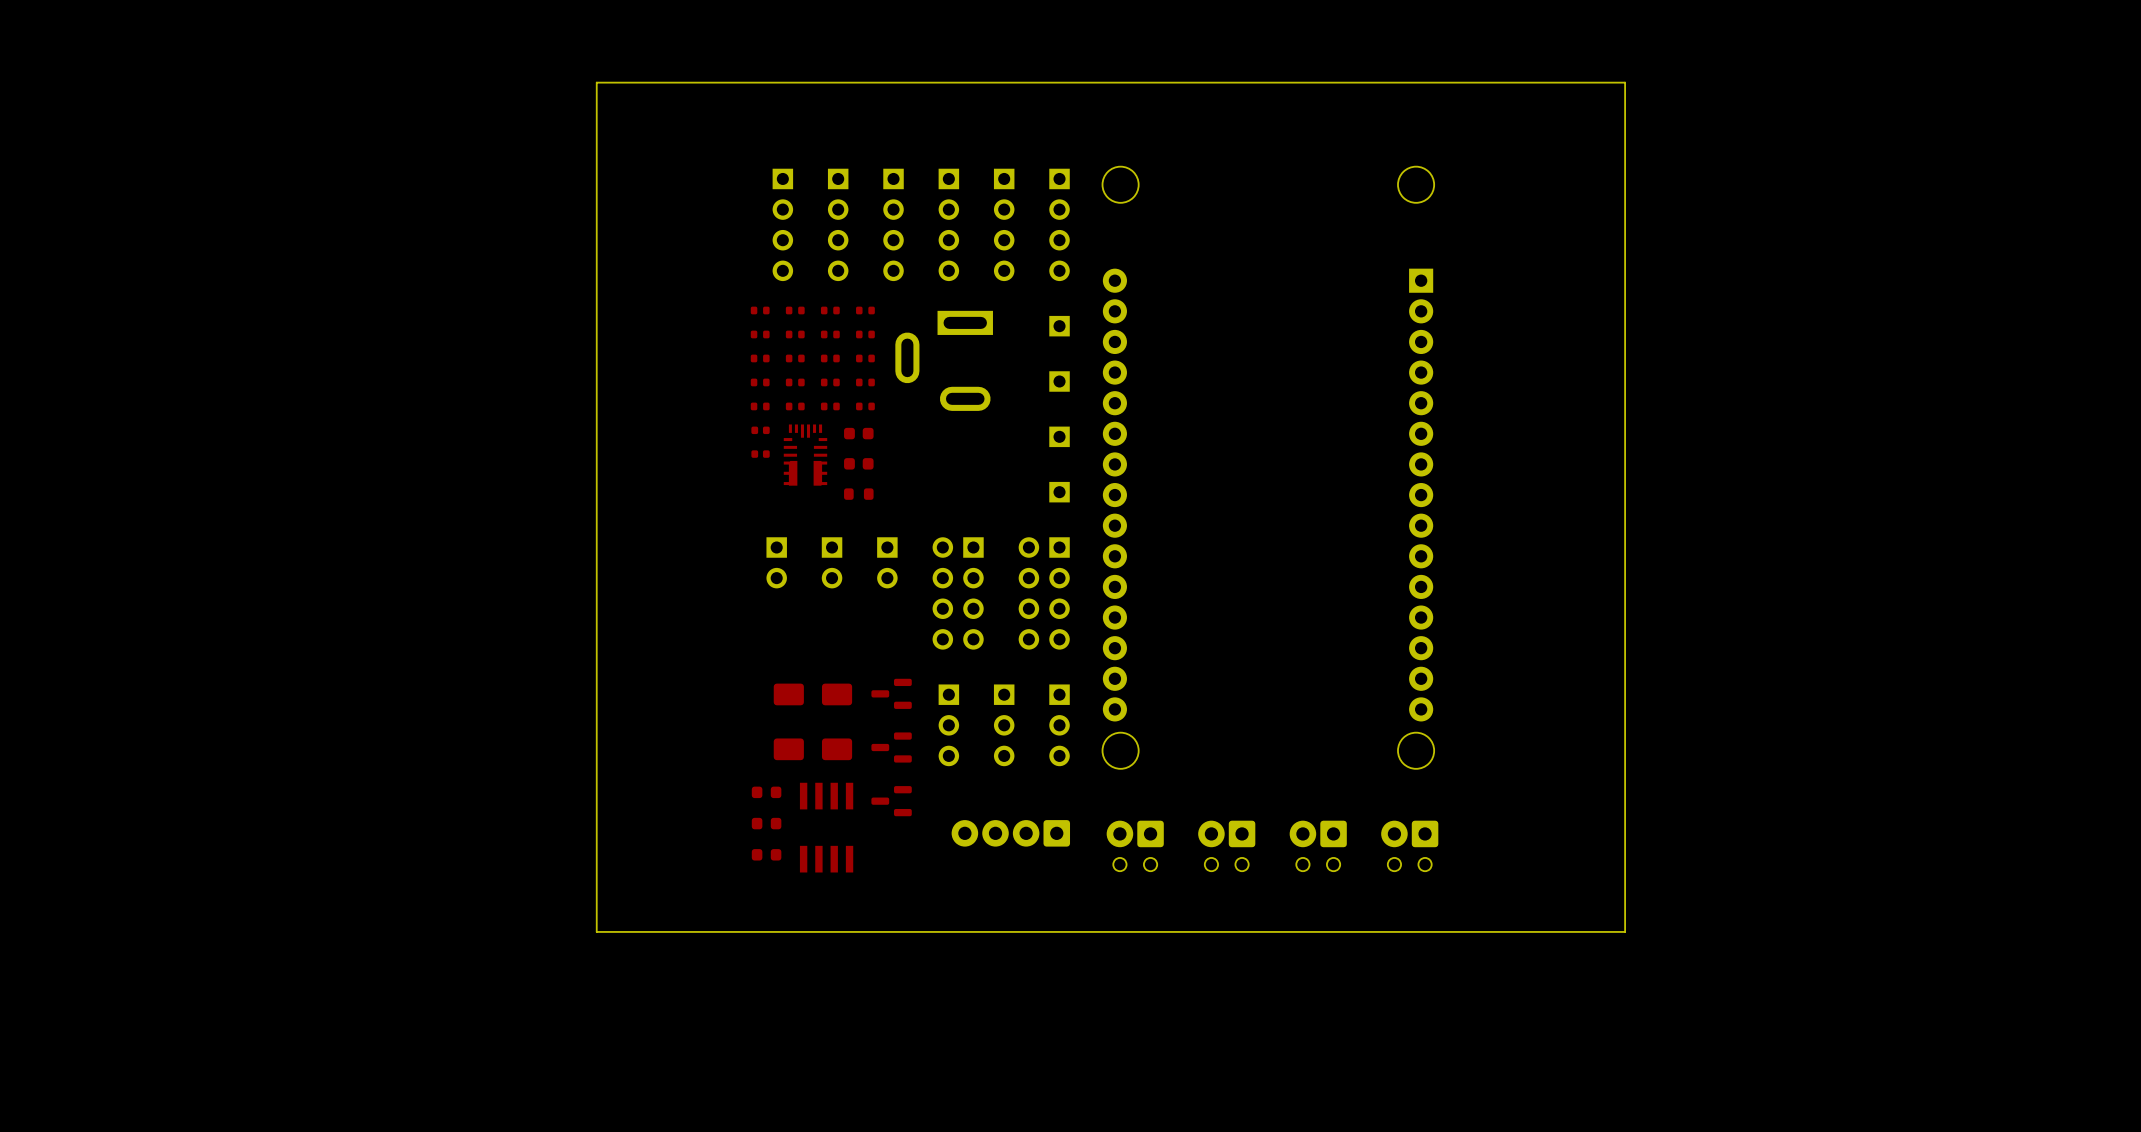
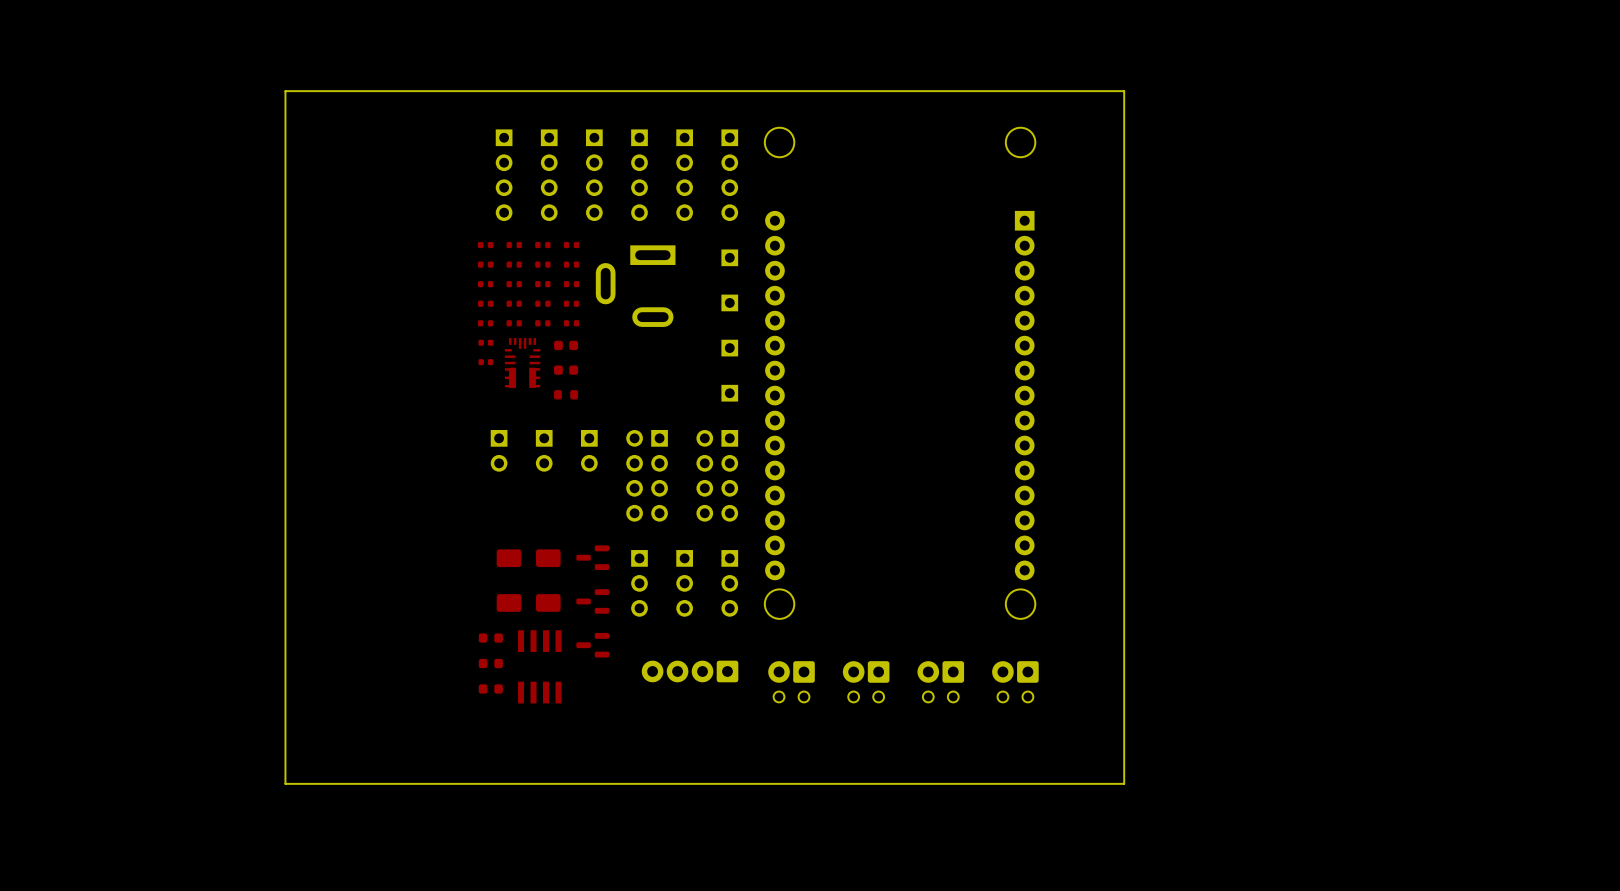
board edge: (1625, 82) (596, 82) (596, 931) (1625, 931) (1625, 82) -> (1124, 91) (1124, 783) (285, 783) (285, 91) (1124, 91)

